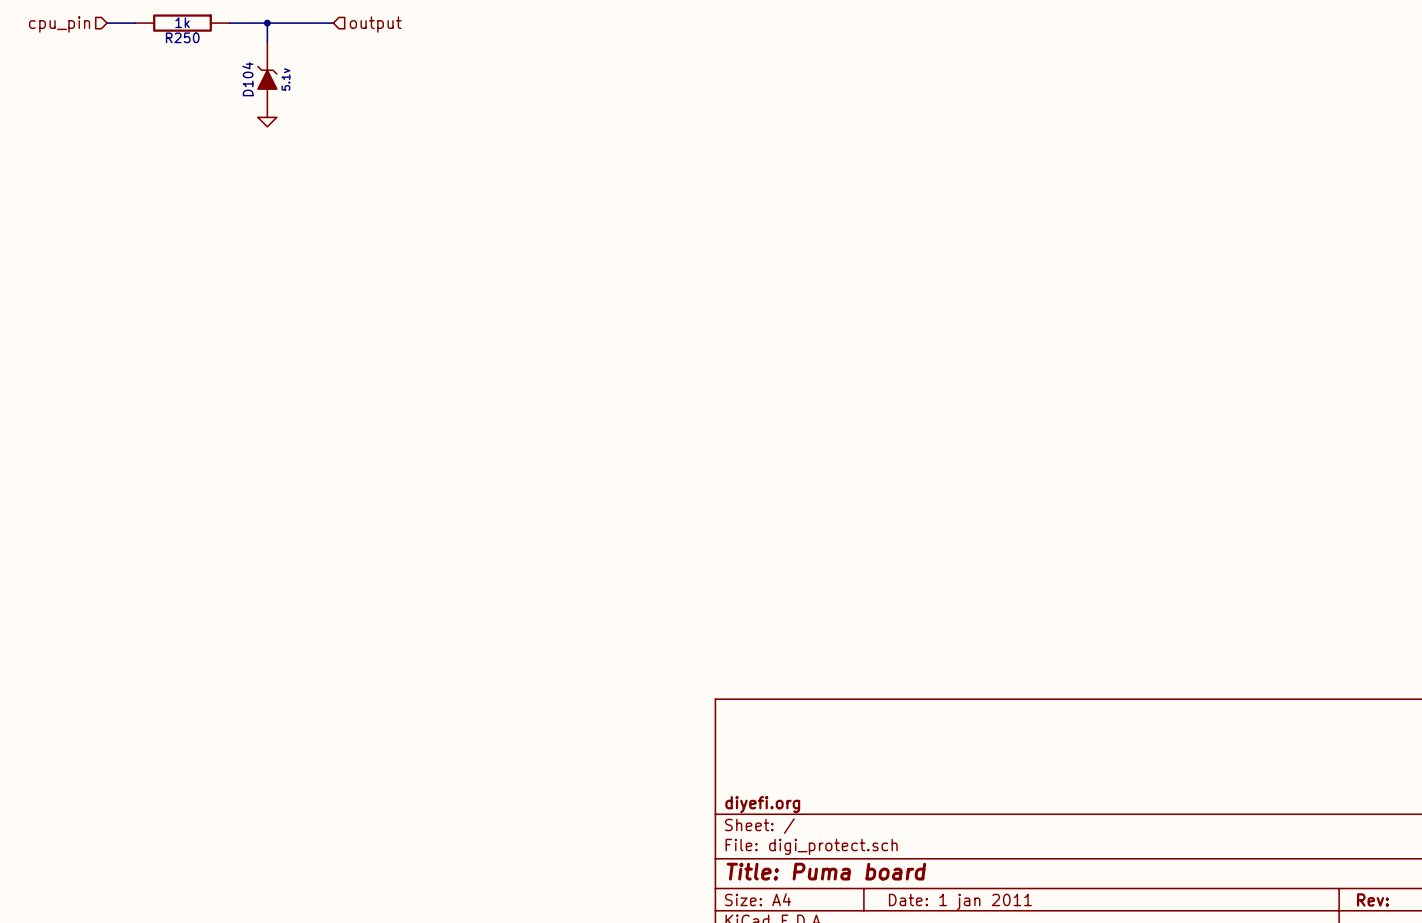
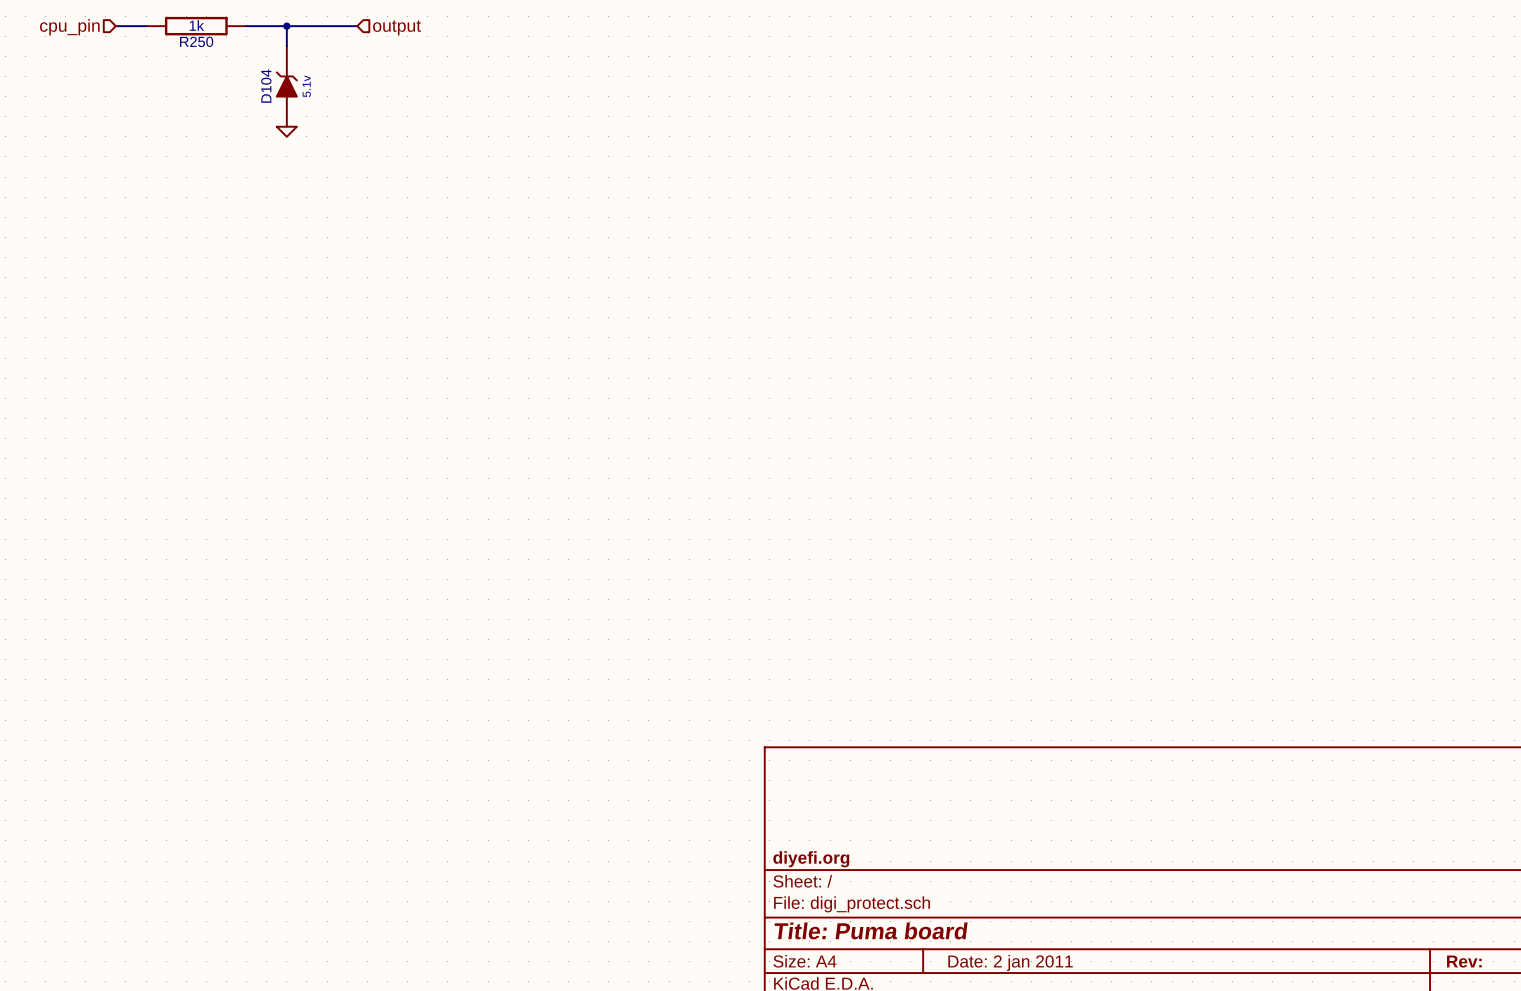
title block: Date: 1 jan 2011 (960, 901) -> Date: 2 jan 2011 (1010, 962)

